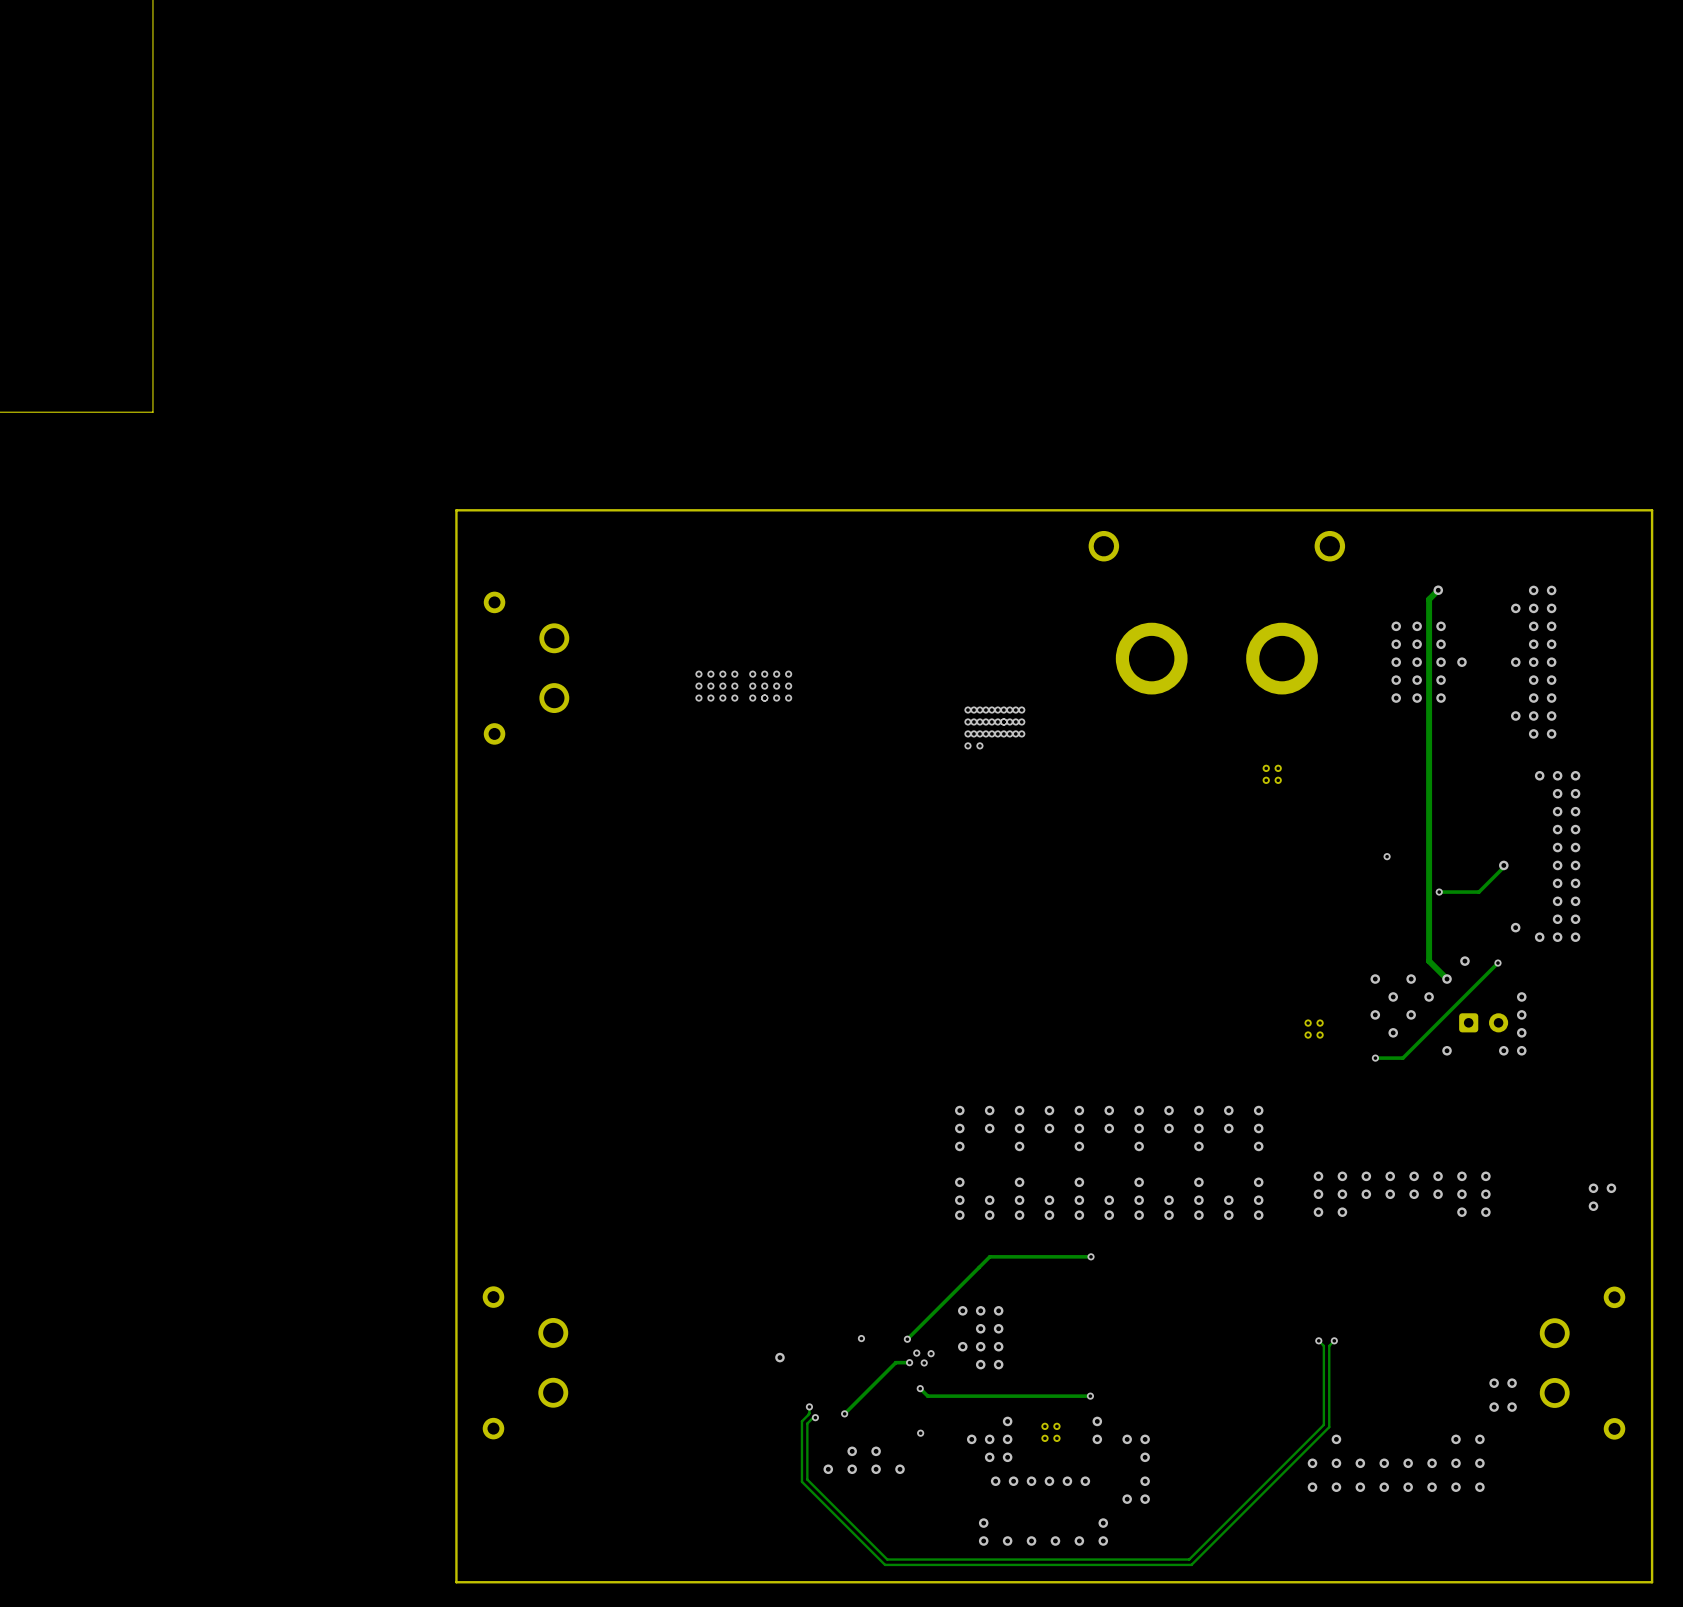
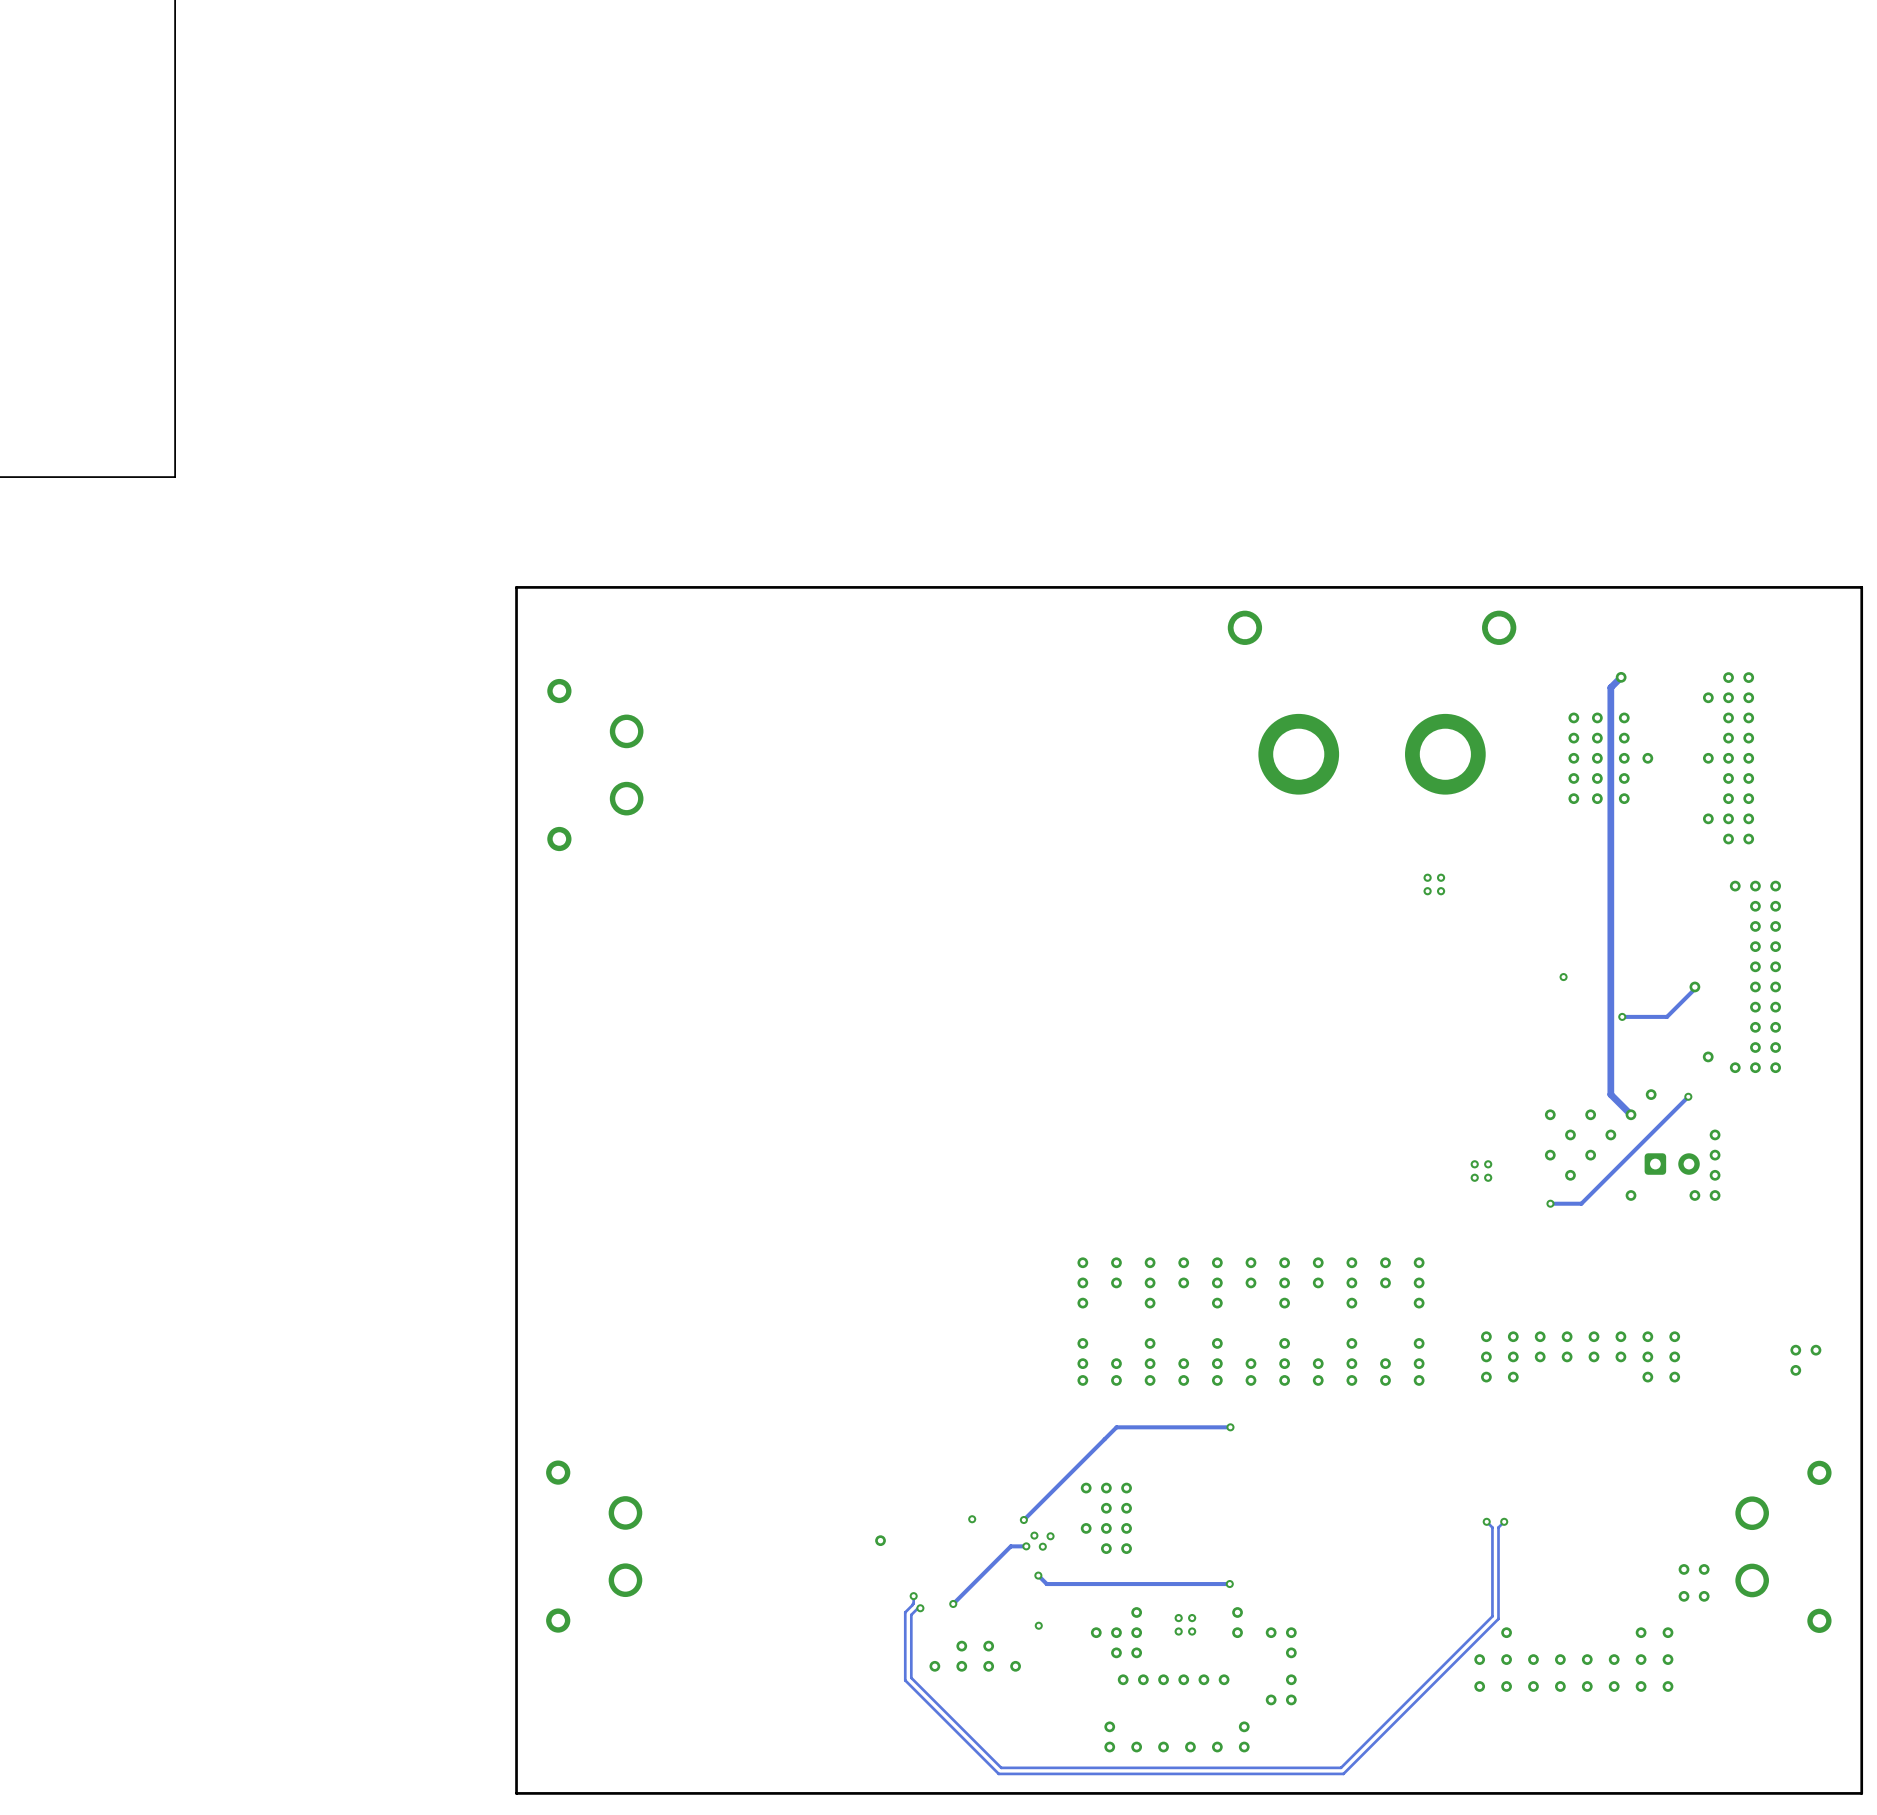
via: (698, 674) -> none
via: (710, 674) -> none
via: (722, 674) -> none
via: (734, 674) -> none
via: (752, 674) -> none
via: (764, 674) -> none
via: (776, 674) -> none
via: (788, 674) -> none
via: (698, 686) -> none
via: (710, 686) -> none
via: (722, 686) -> none
via: (734, 686) -> none
via: (752, 686) -> none
via: (764, 686) -> none
via: (776, 686) -> none
via: (788, 686) -> none
via: (698, 698) -> none
via: (710, 698) -> none
via: (722, 698) -> none
via: (734, 698) -> none
via: (752, 698) -> none
via: (764, 698) -> none
via: (776, 698) -> none
via: (788, 698) -> none
via: (967, 710) -> none
via: (973, 710) -> none
via: (979, 710) -> none
via: (985, 710) -> none
via: (991, 710) -> none
via: (997, 710) -> none
via: (1003, 710) -> none
via: (1009, 710) -> none
via: (1015, 710) -> none
via: (1021, 710) -> none
via: (967, 721) -> none
via: (973, 721) -> none
via: (979, 721) -> none
via: (985, 721) -> none
via: (991, 721) -> none
via: (997, 721) -> none
via: (1003, 721) -> none
via: (1009, 721) -> none
via: (1015, 721) -> none
via: (1021, 721) -> none
via: (967, 733) -> none
via: (973, 733) -> none
via: (979, 733) -> none
via: (985, 733) -> none
via: (991, 733) -> none
via: (997, 733) -> none
via: (1003, 733) -> none
via: (1009, 733) -> none
via: (1015, 733) -> none
via: (1021, 733) -> none
via: (967, 745) -> none
via: (979, 745) -> none

